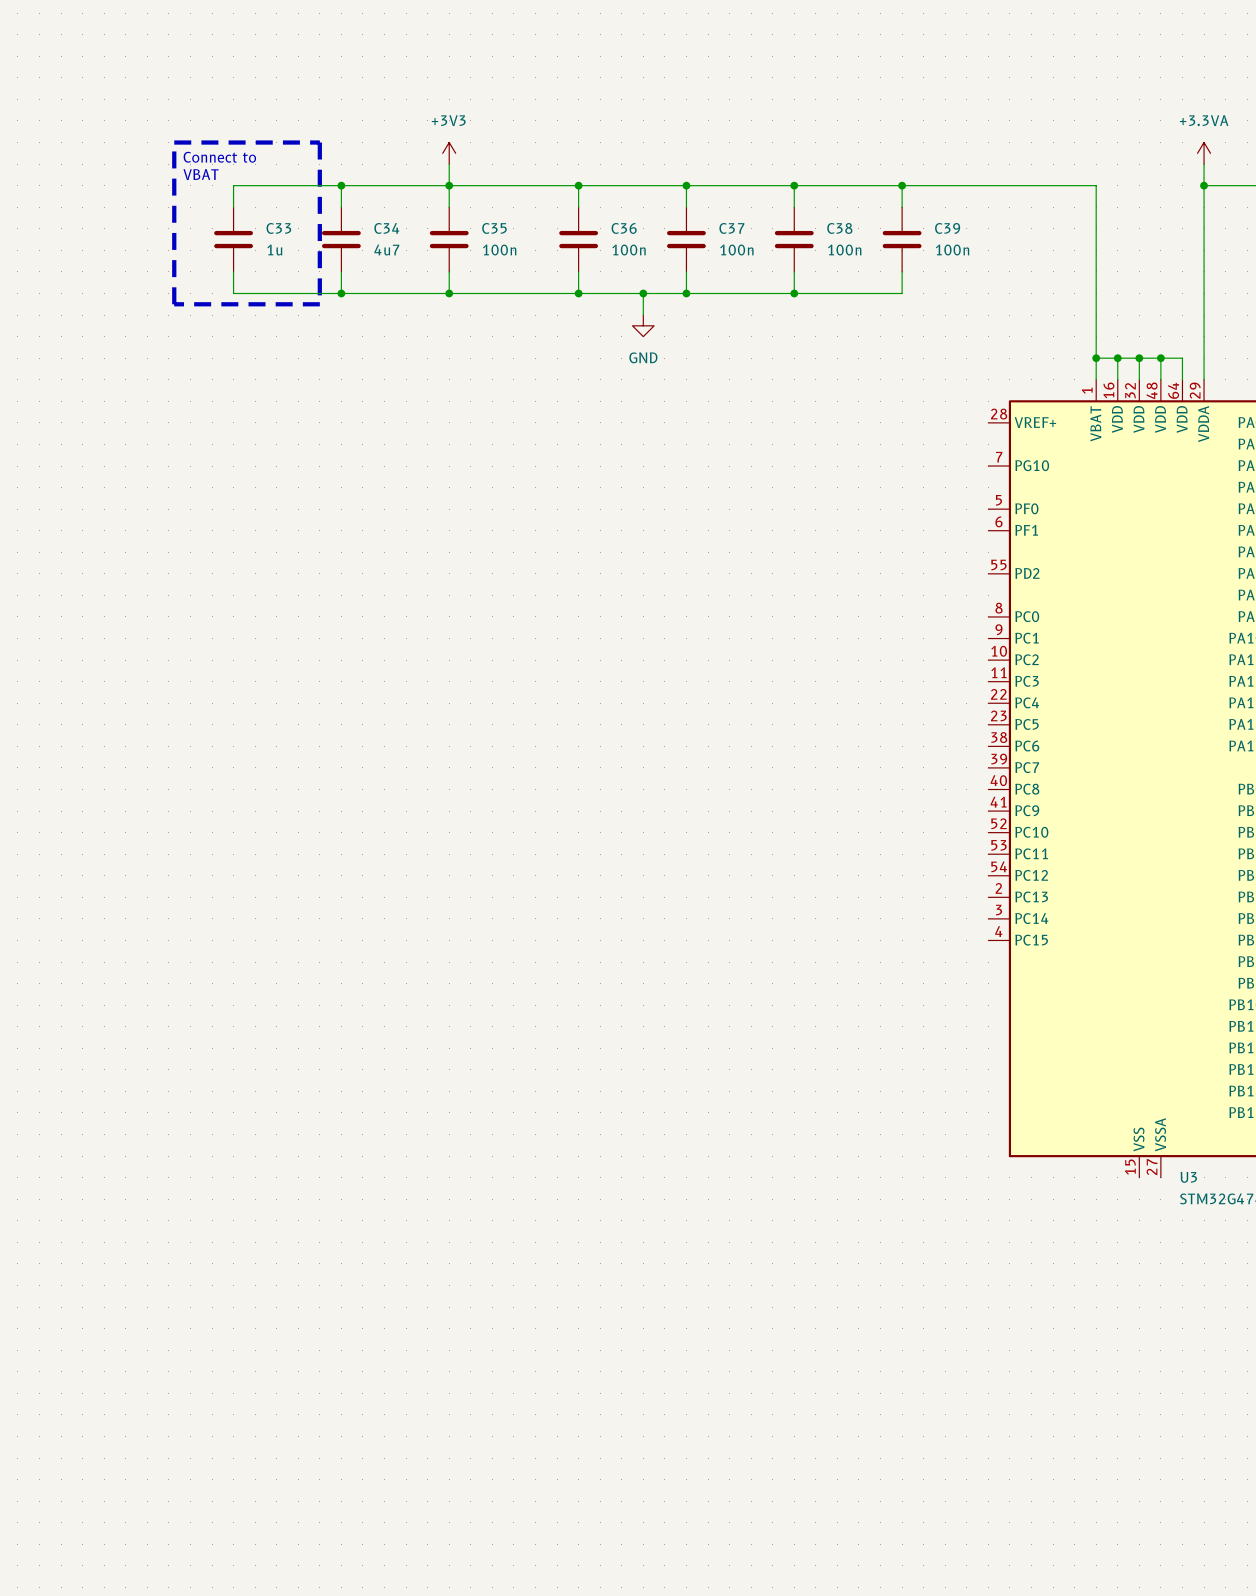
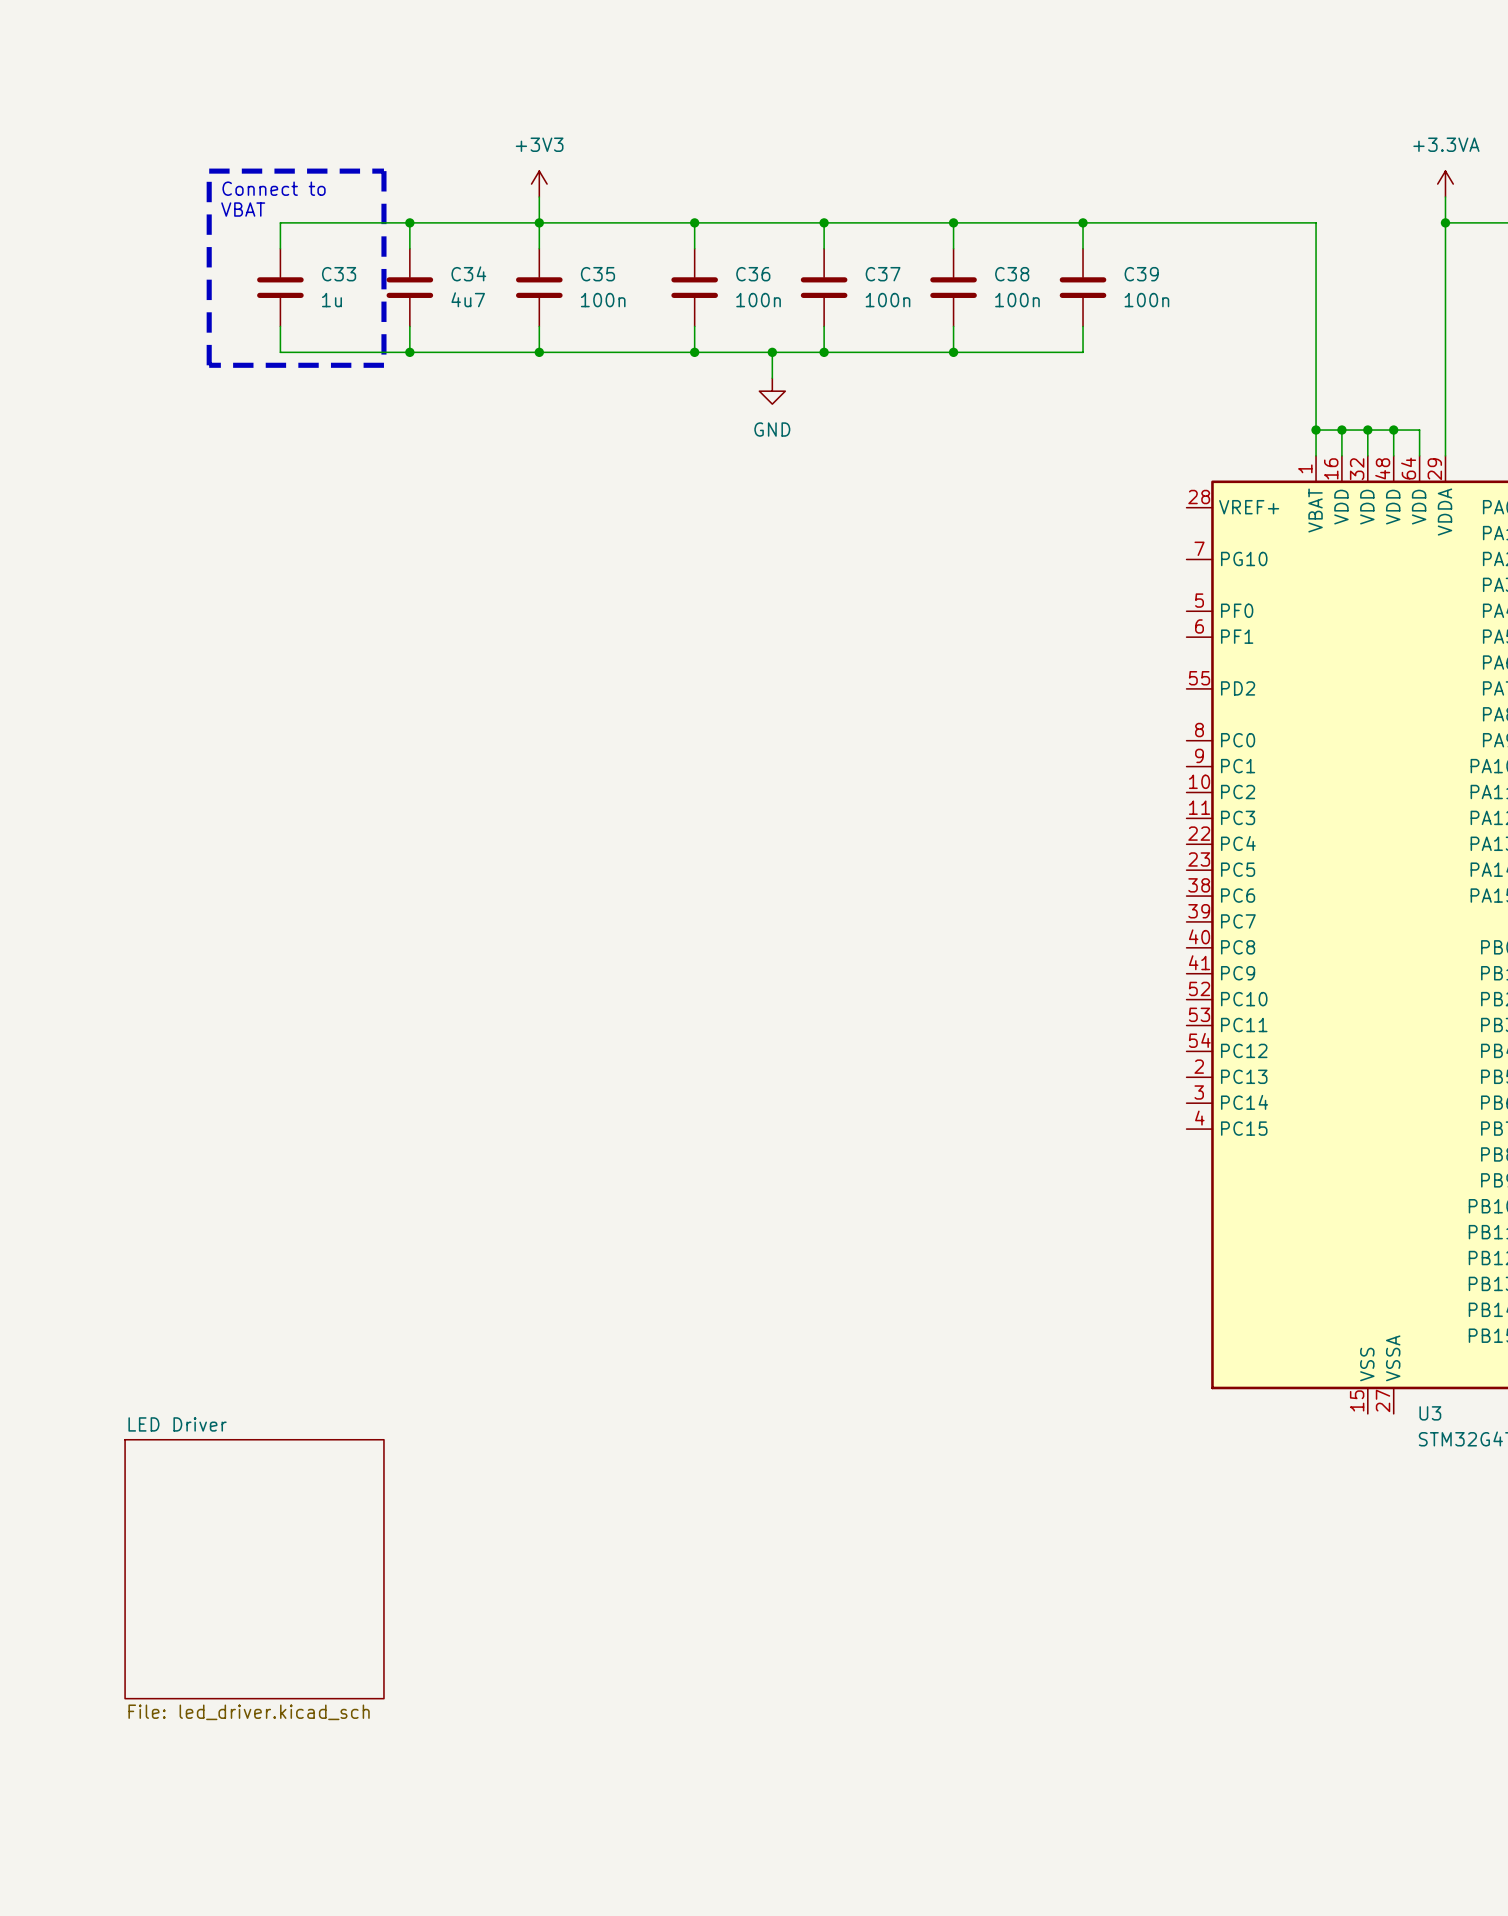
sheet LED Driver: none -> File: led_driver.kicad_sch (254, 1569)

